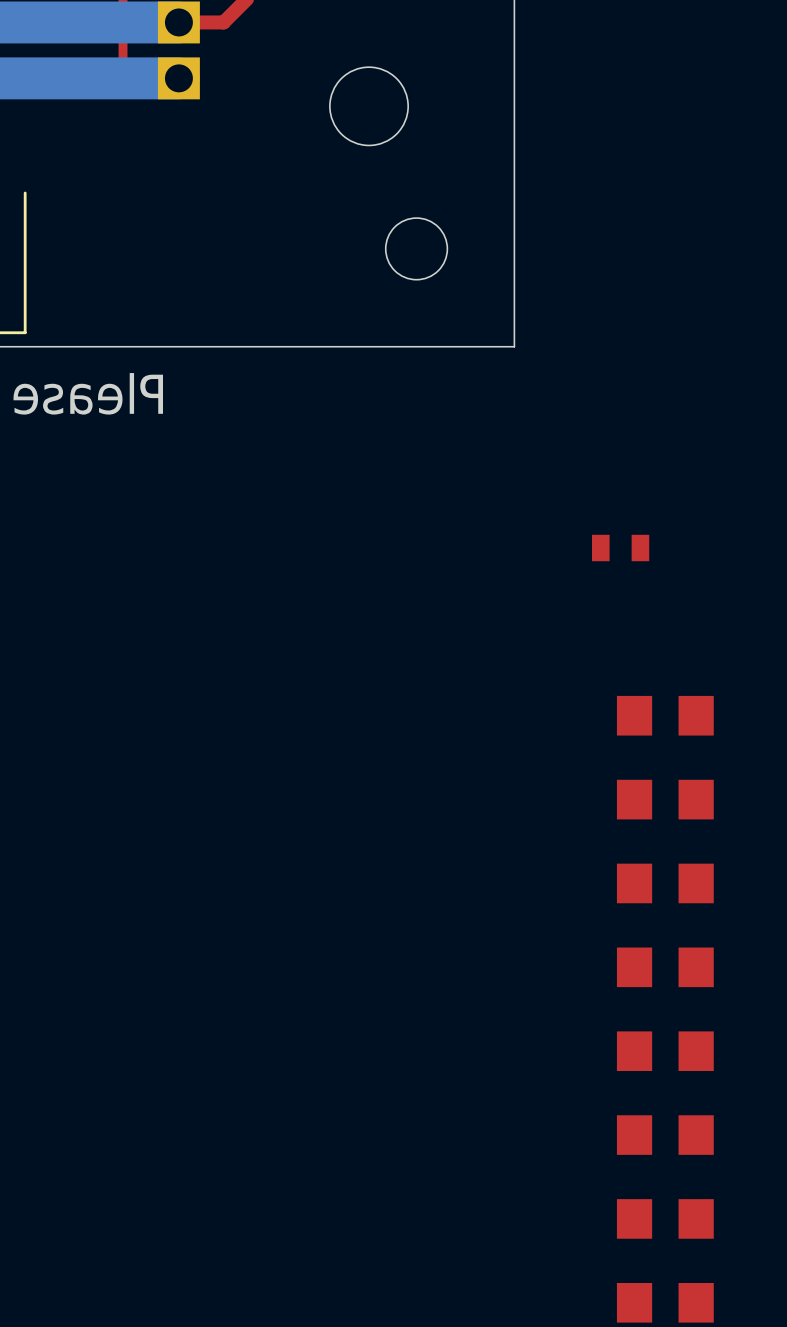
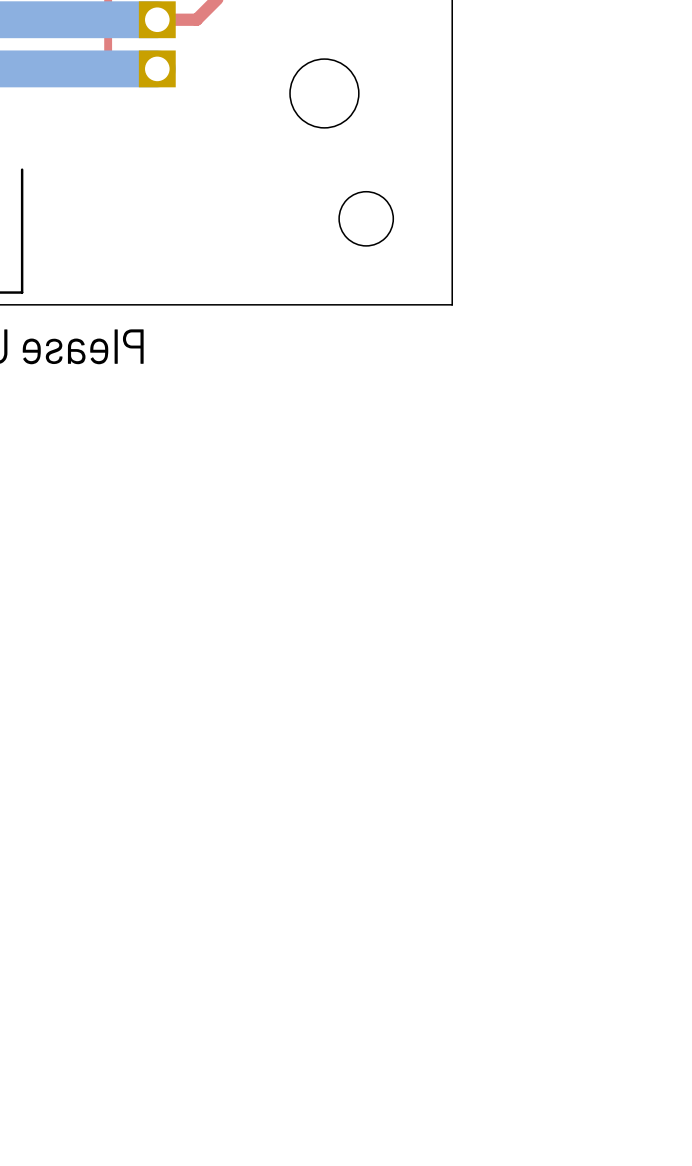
part: (620, 548) -> none
part: (665, 715) -> none
part: (665, 799) -> none
part: (665, 883) -> none
part: (665, 967) -> none
part: (665, 1051) -> none
part: (665, 1135) -> none
part: (665, 1218) -> none
part: (665, 1302) -> none

